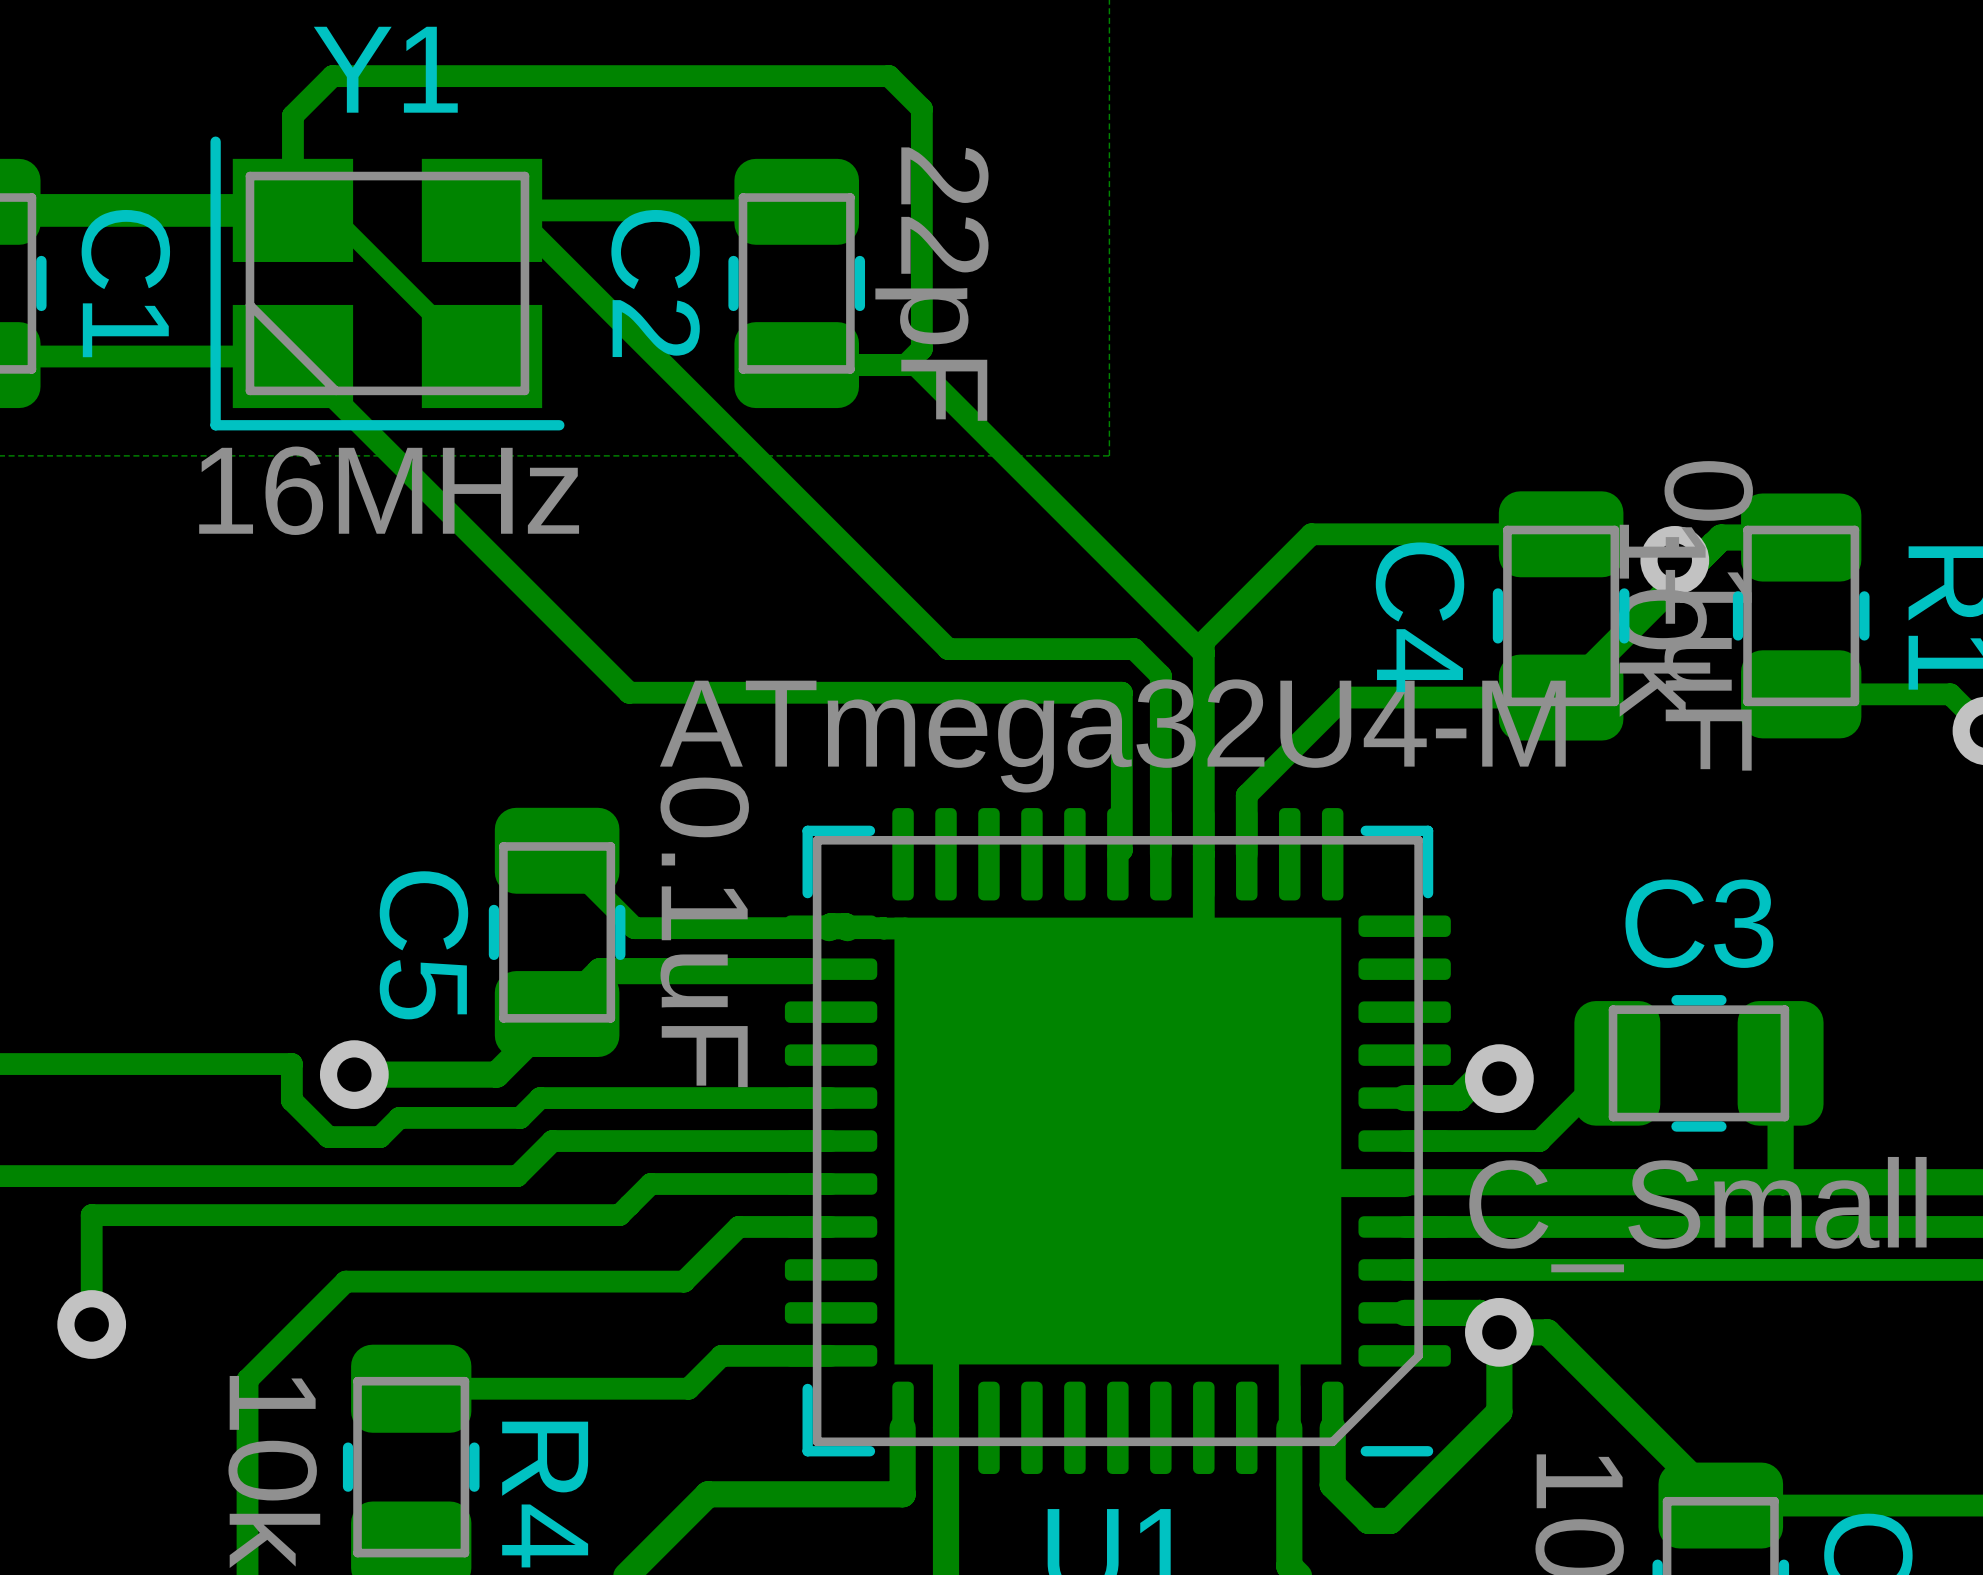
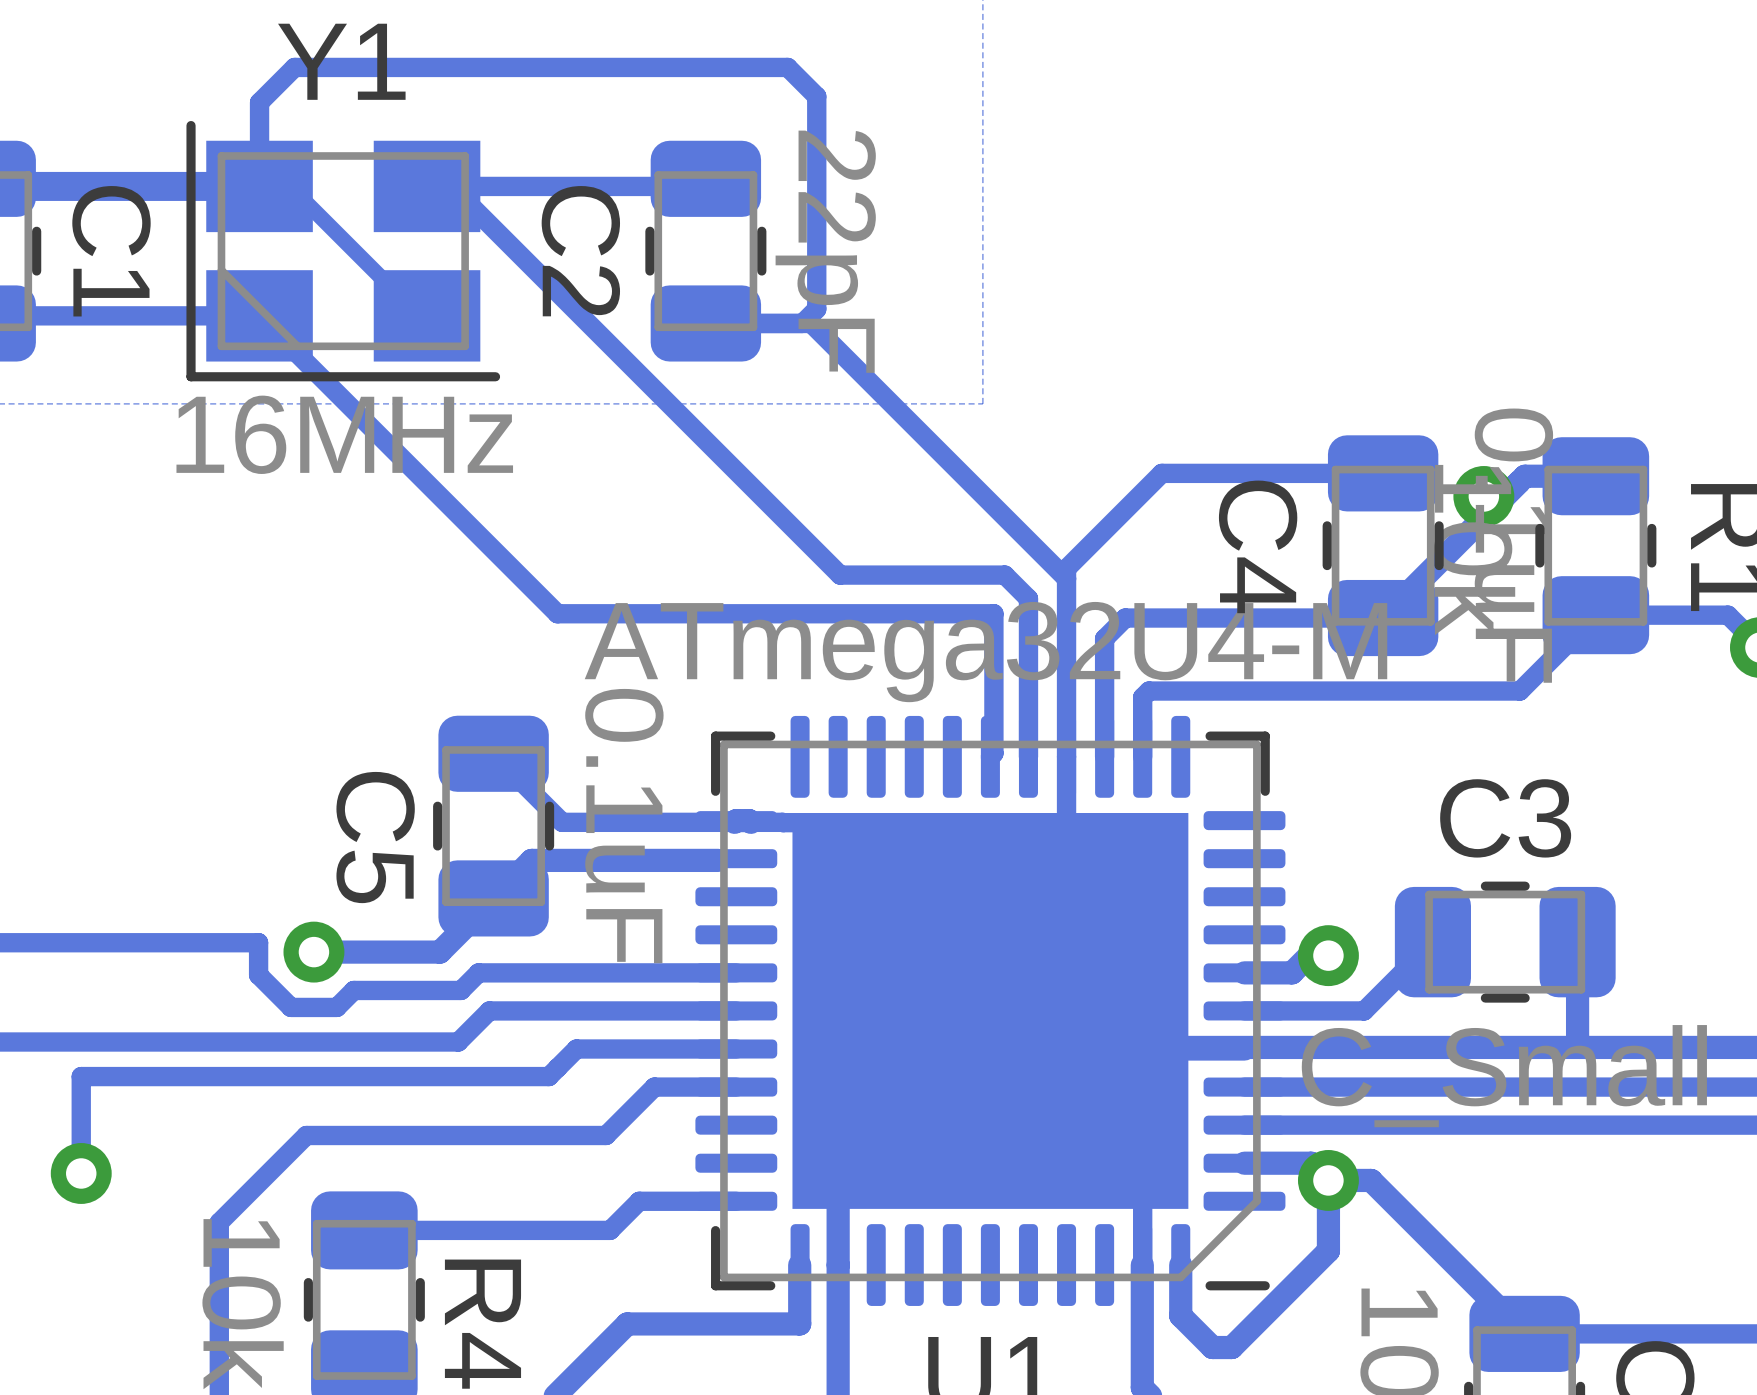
track: none -> (1595, 615) (1519, 691) (1149, 691) (1142, 697) (1142, 756)
track: (1344, 697) (1246, 795) -> (1191, 618) (1125, 618) (1104, 638) (1104, 704)

